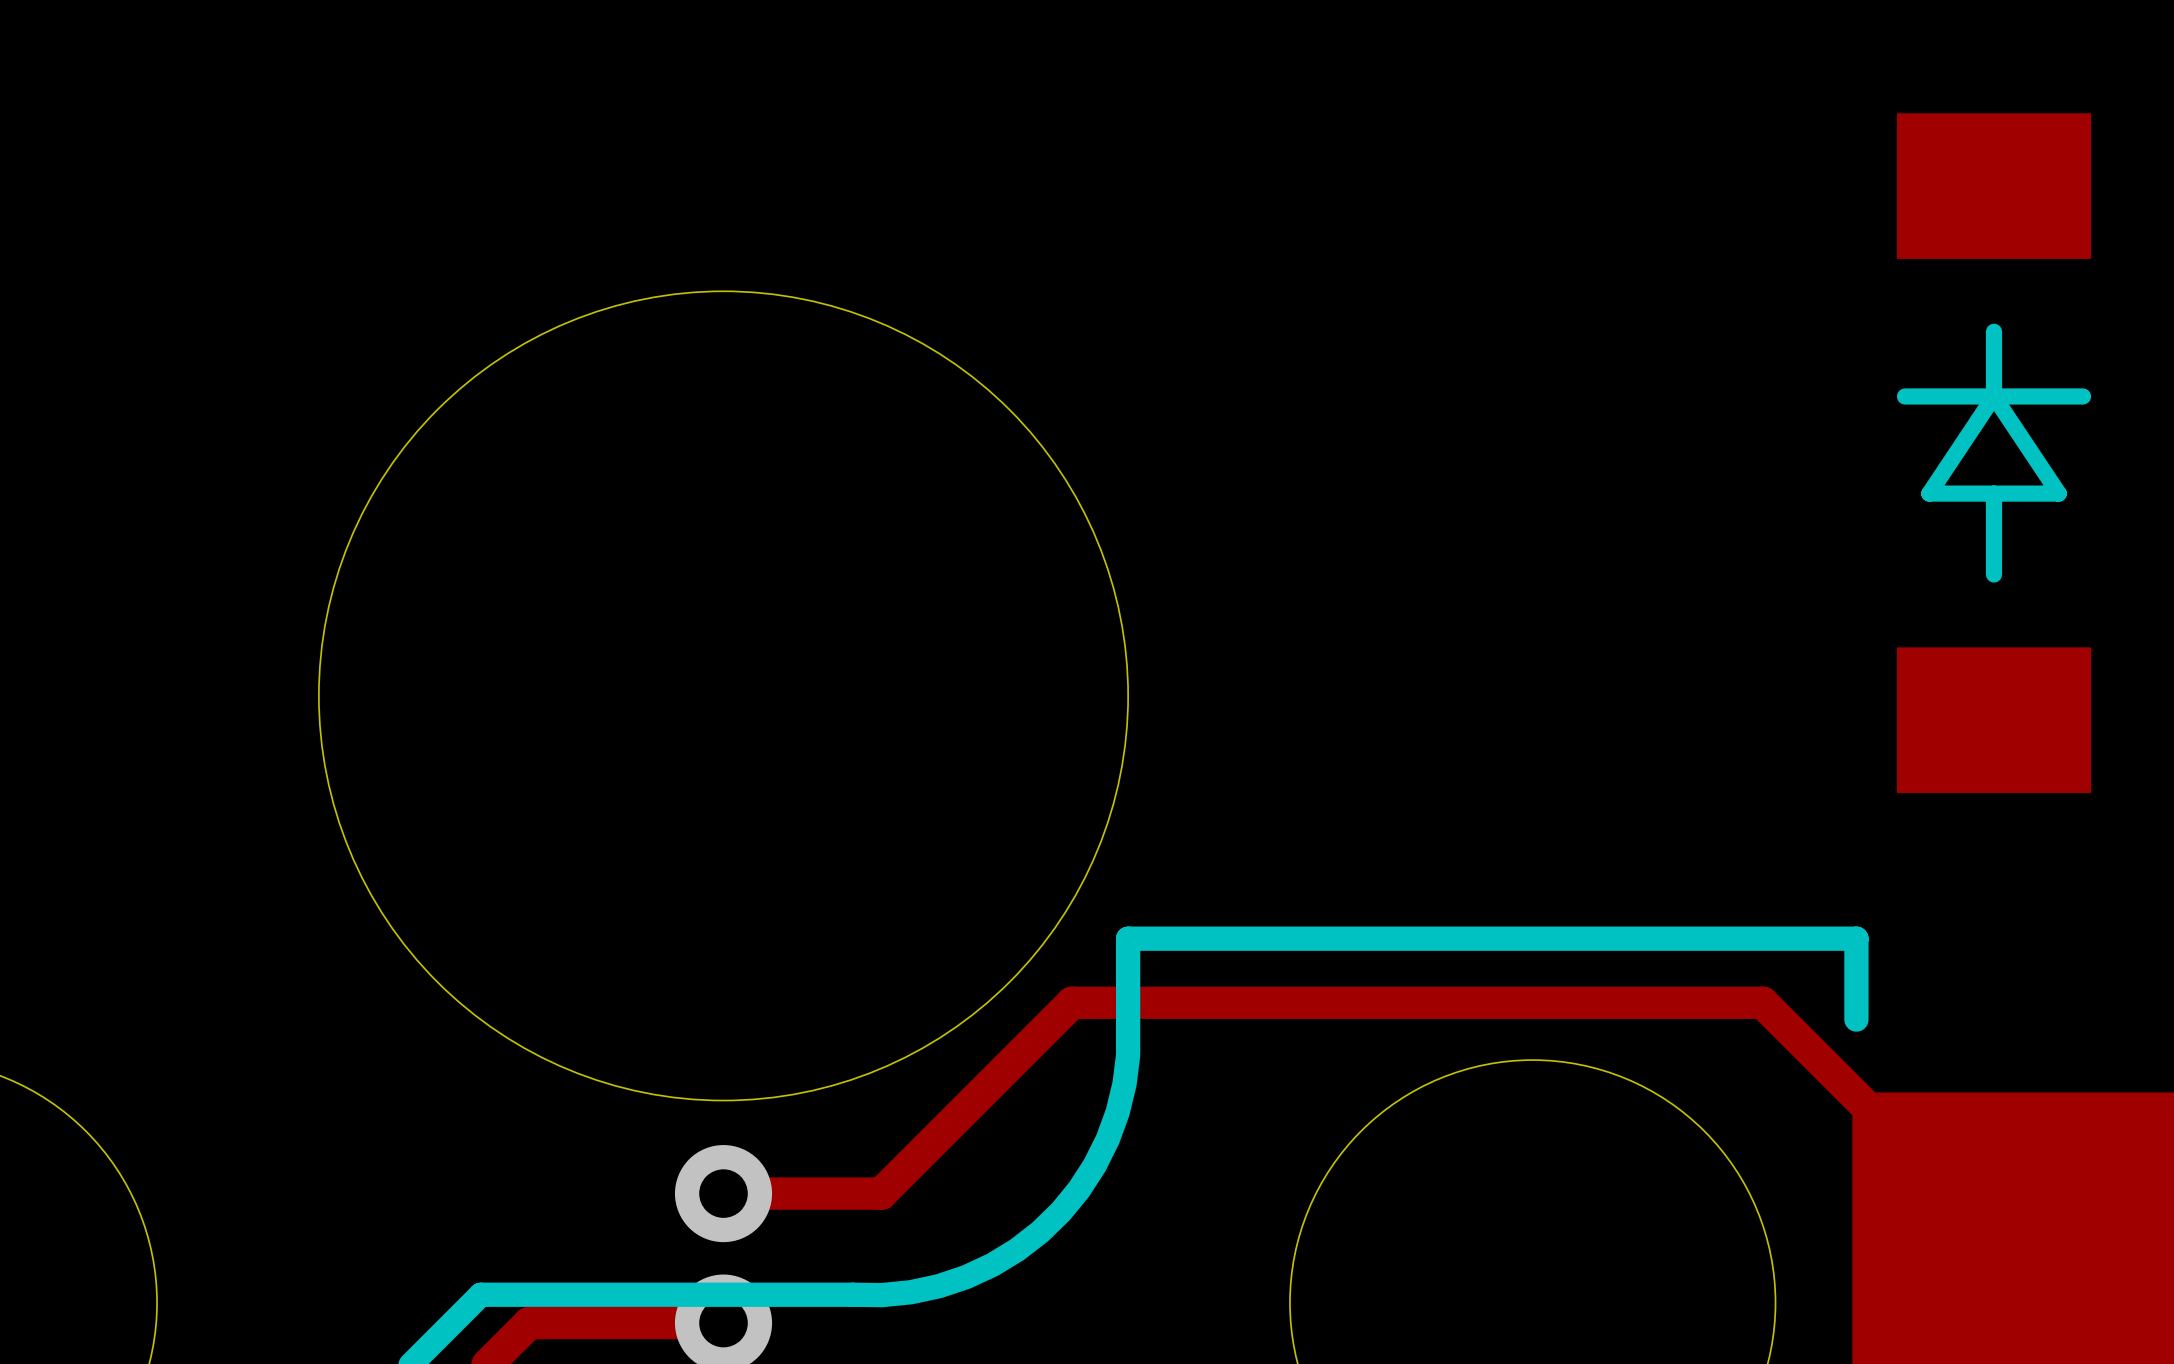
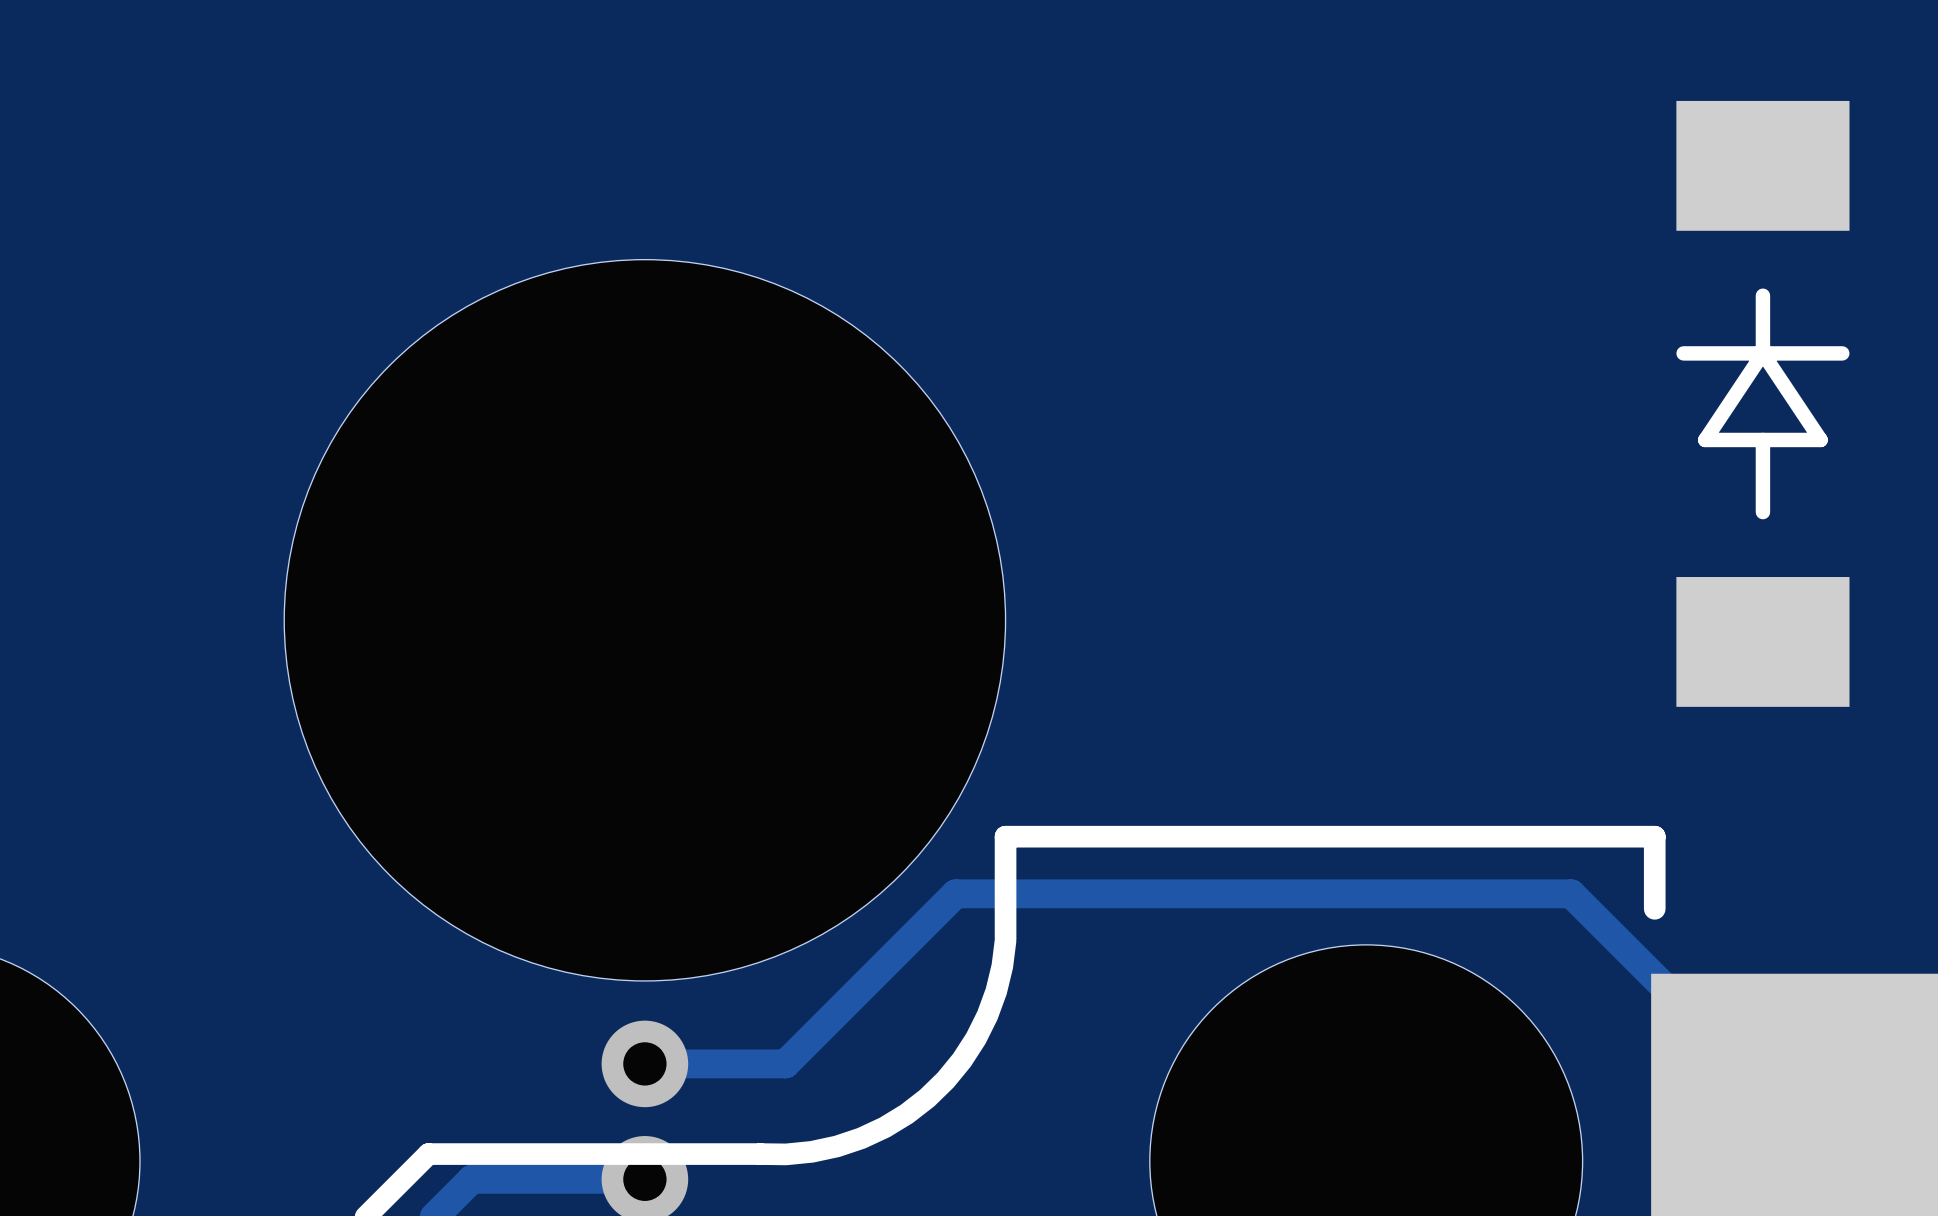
part position: (1994, 453) -> (1762, 403)

